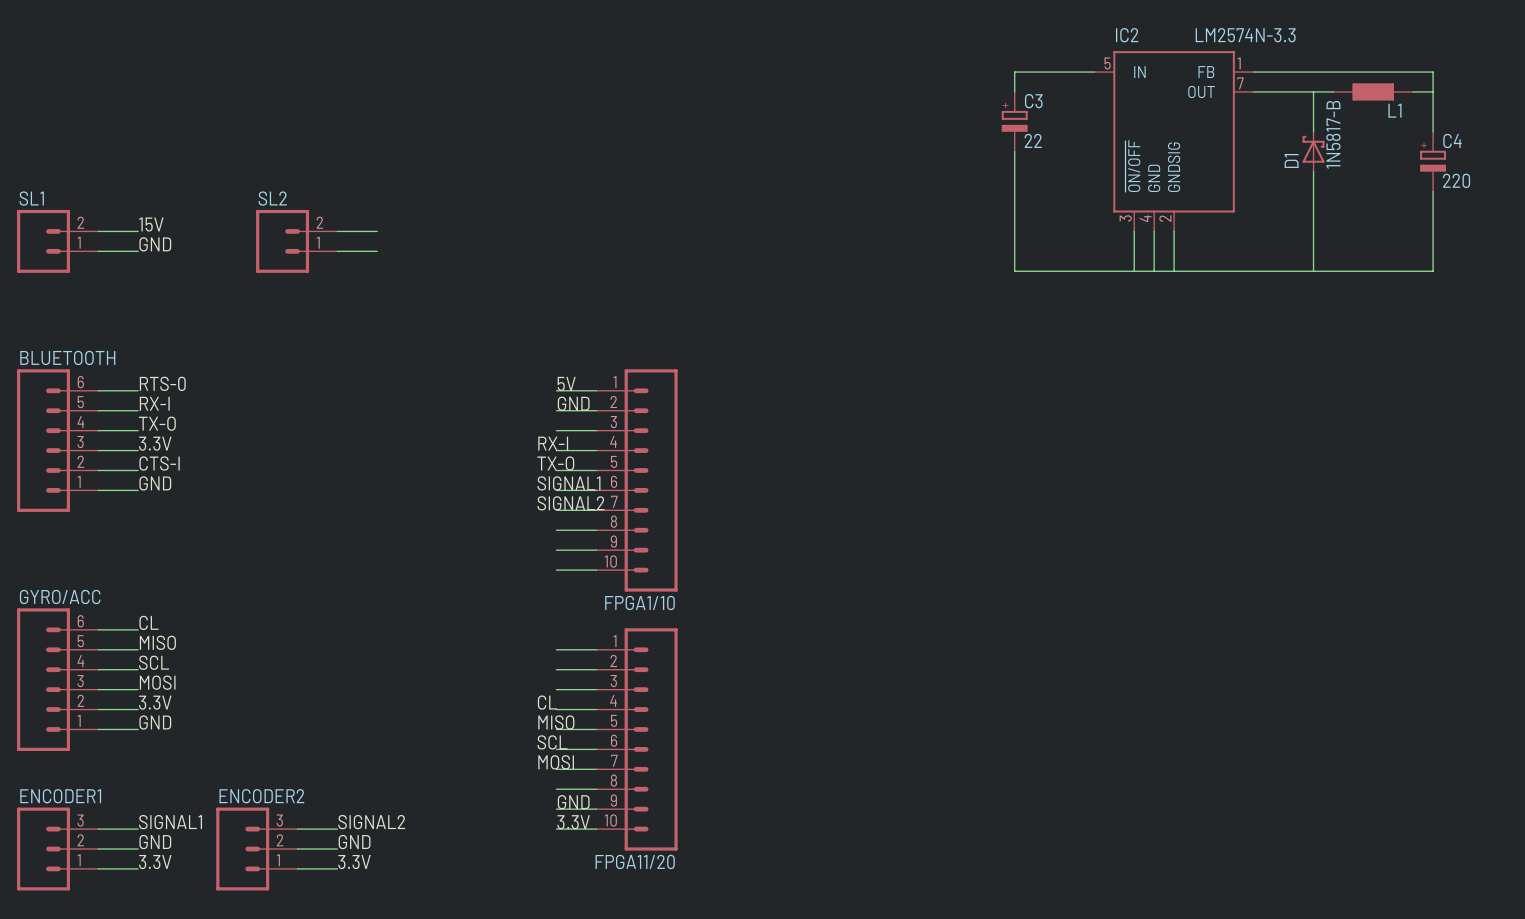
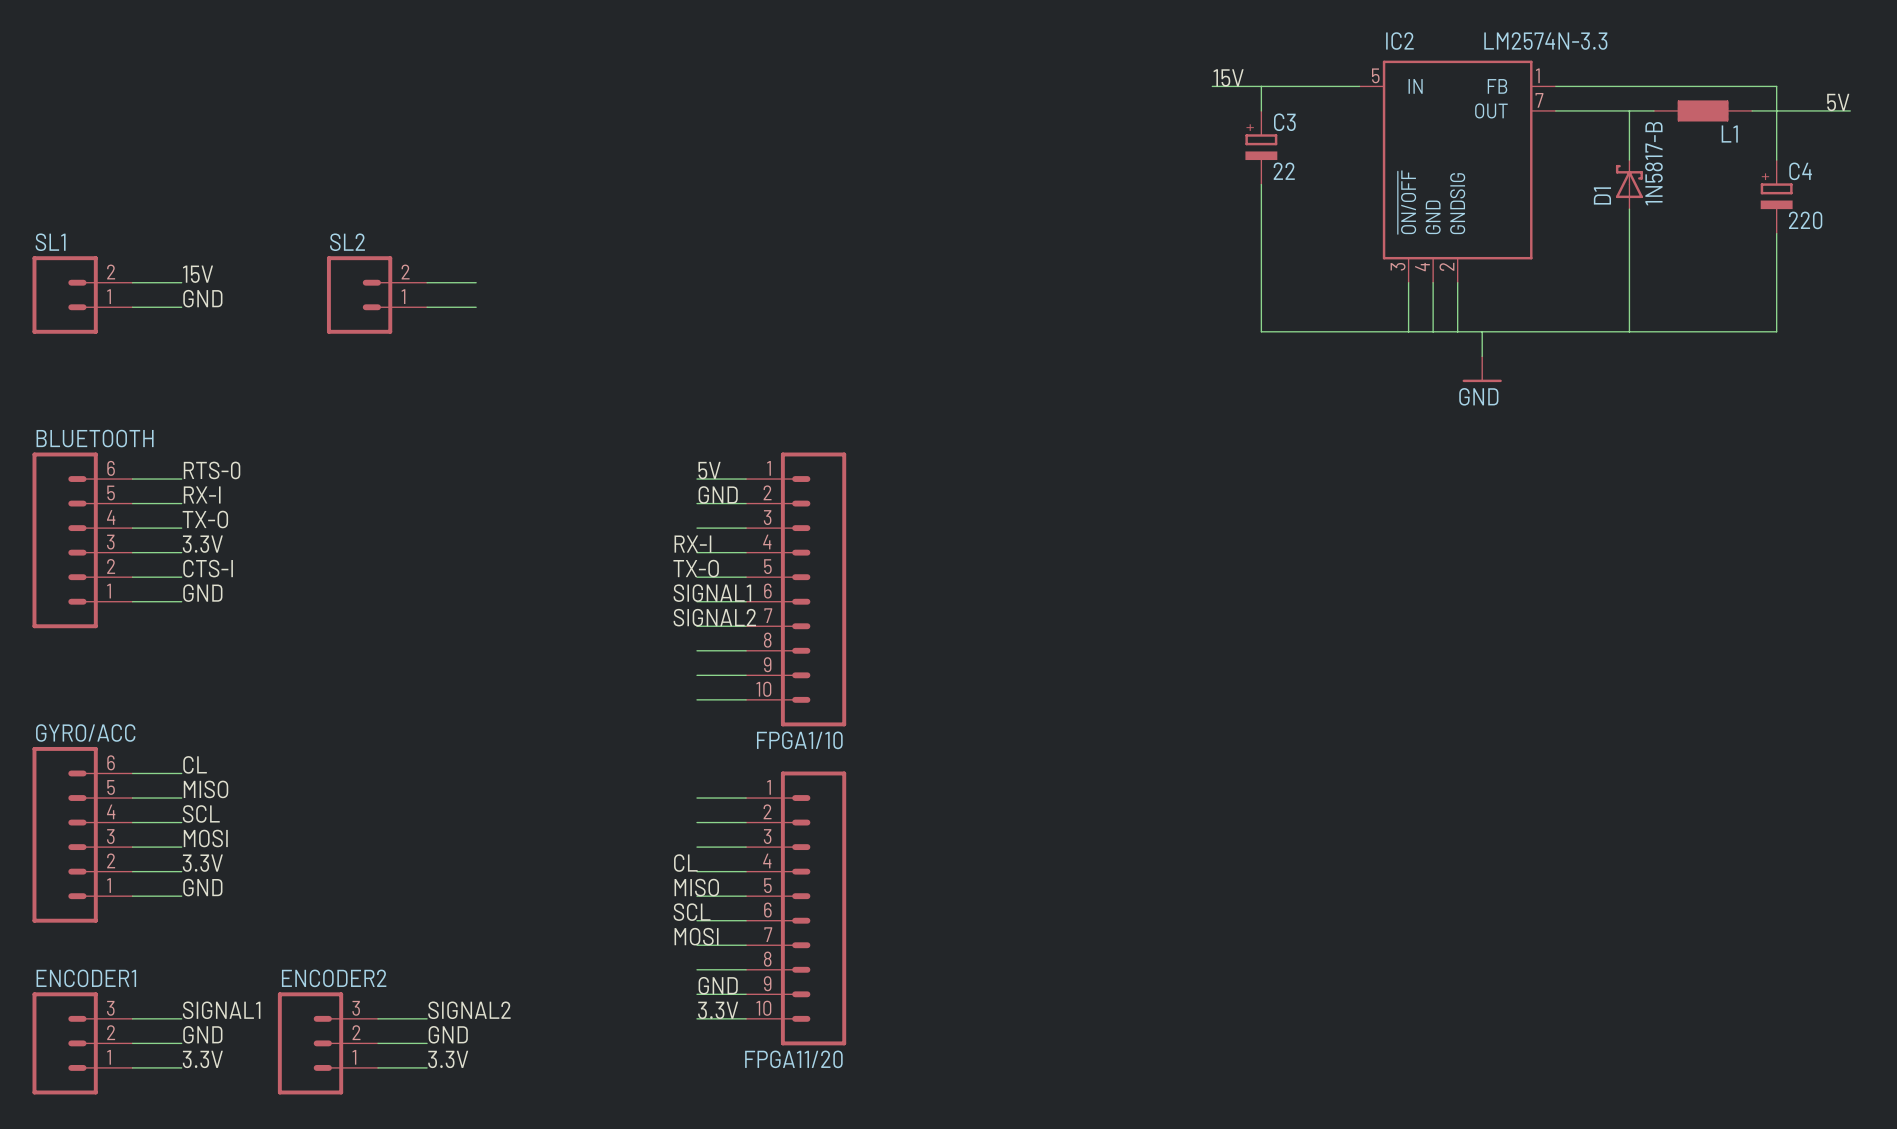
label: none -> 15V (1228, 77)
wire: none -> (1212, 86) (1261, 86)
label: none -> 5V (1838, 102)
wire: none -> (1776, 110) (1850, 110)
wire: none -> (1482, 331) (1482, 356)
power symbol: none -> GND (1482, 369)

